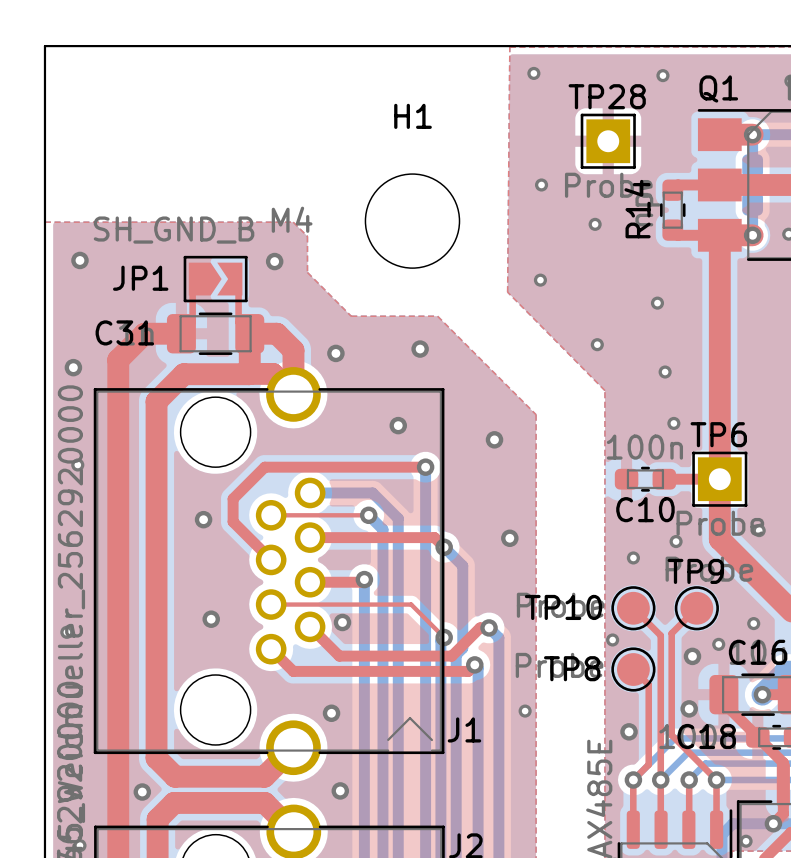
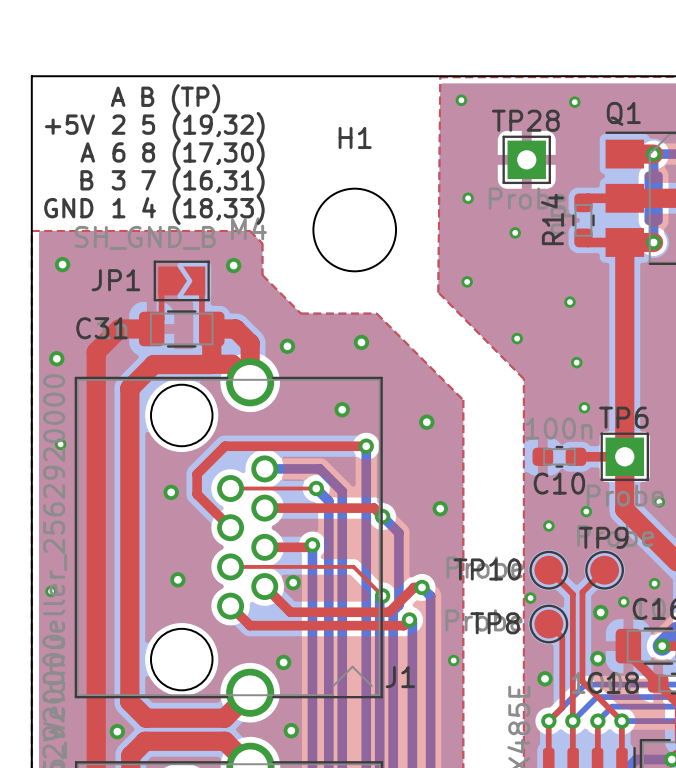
text: none -> A B (TP) (165, 98)
text: none -> +5V (70, 124)
text: none -> 2 5 (19,32) (188, 126)
text: none -> A (87, 152)
text: none -> 6 8 (17,30) (188, 154)
text: none -> B (86, 180)
text: none -> 3 7 (16,31) (188, 182)
text: none -> GND (68, 208)
text: none -> 1 4 (18,33) (188, 210)

